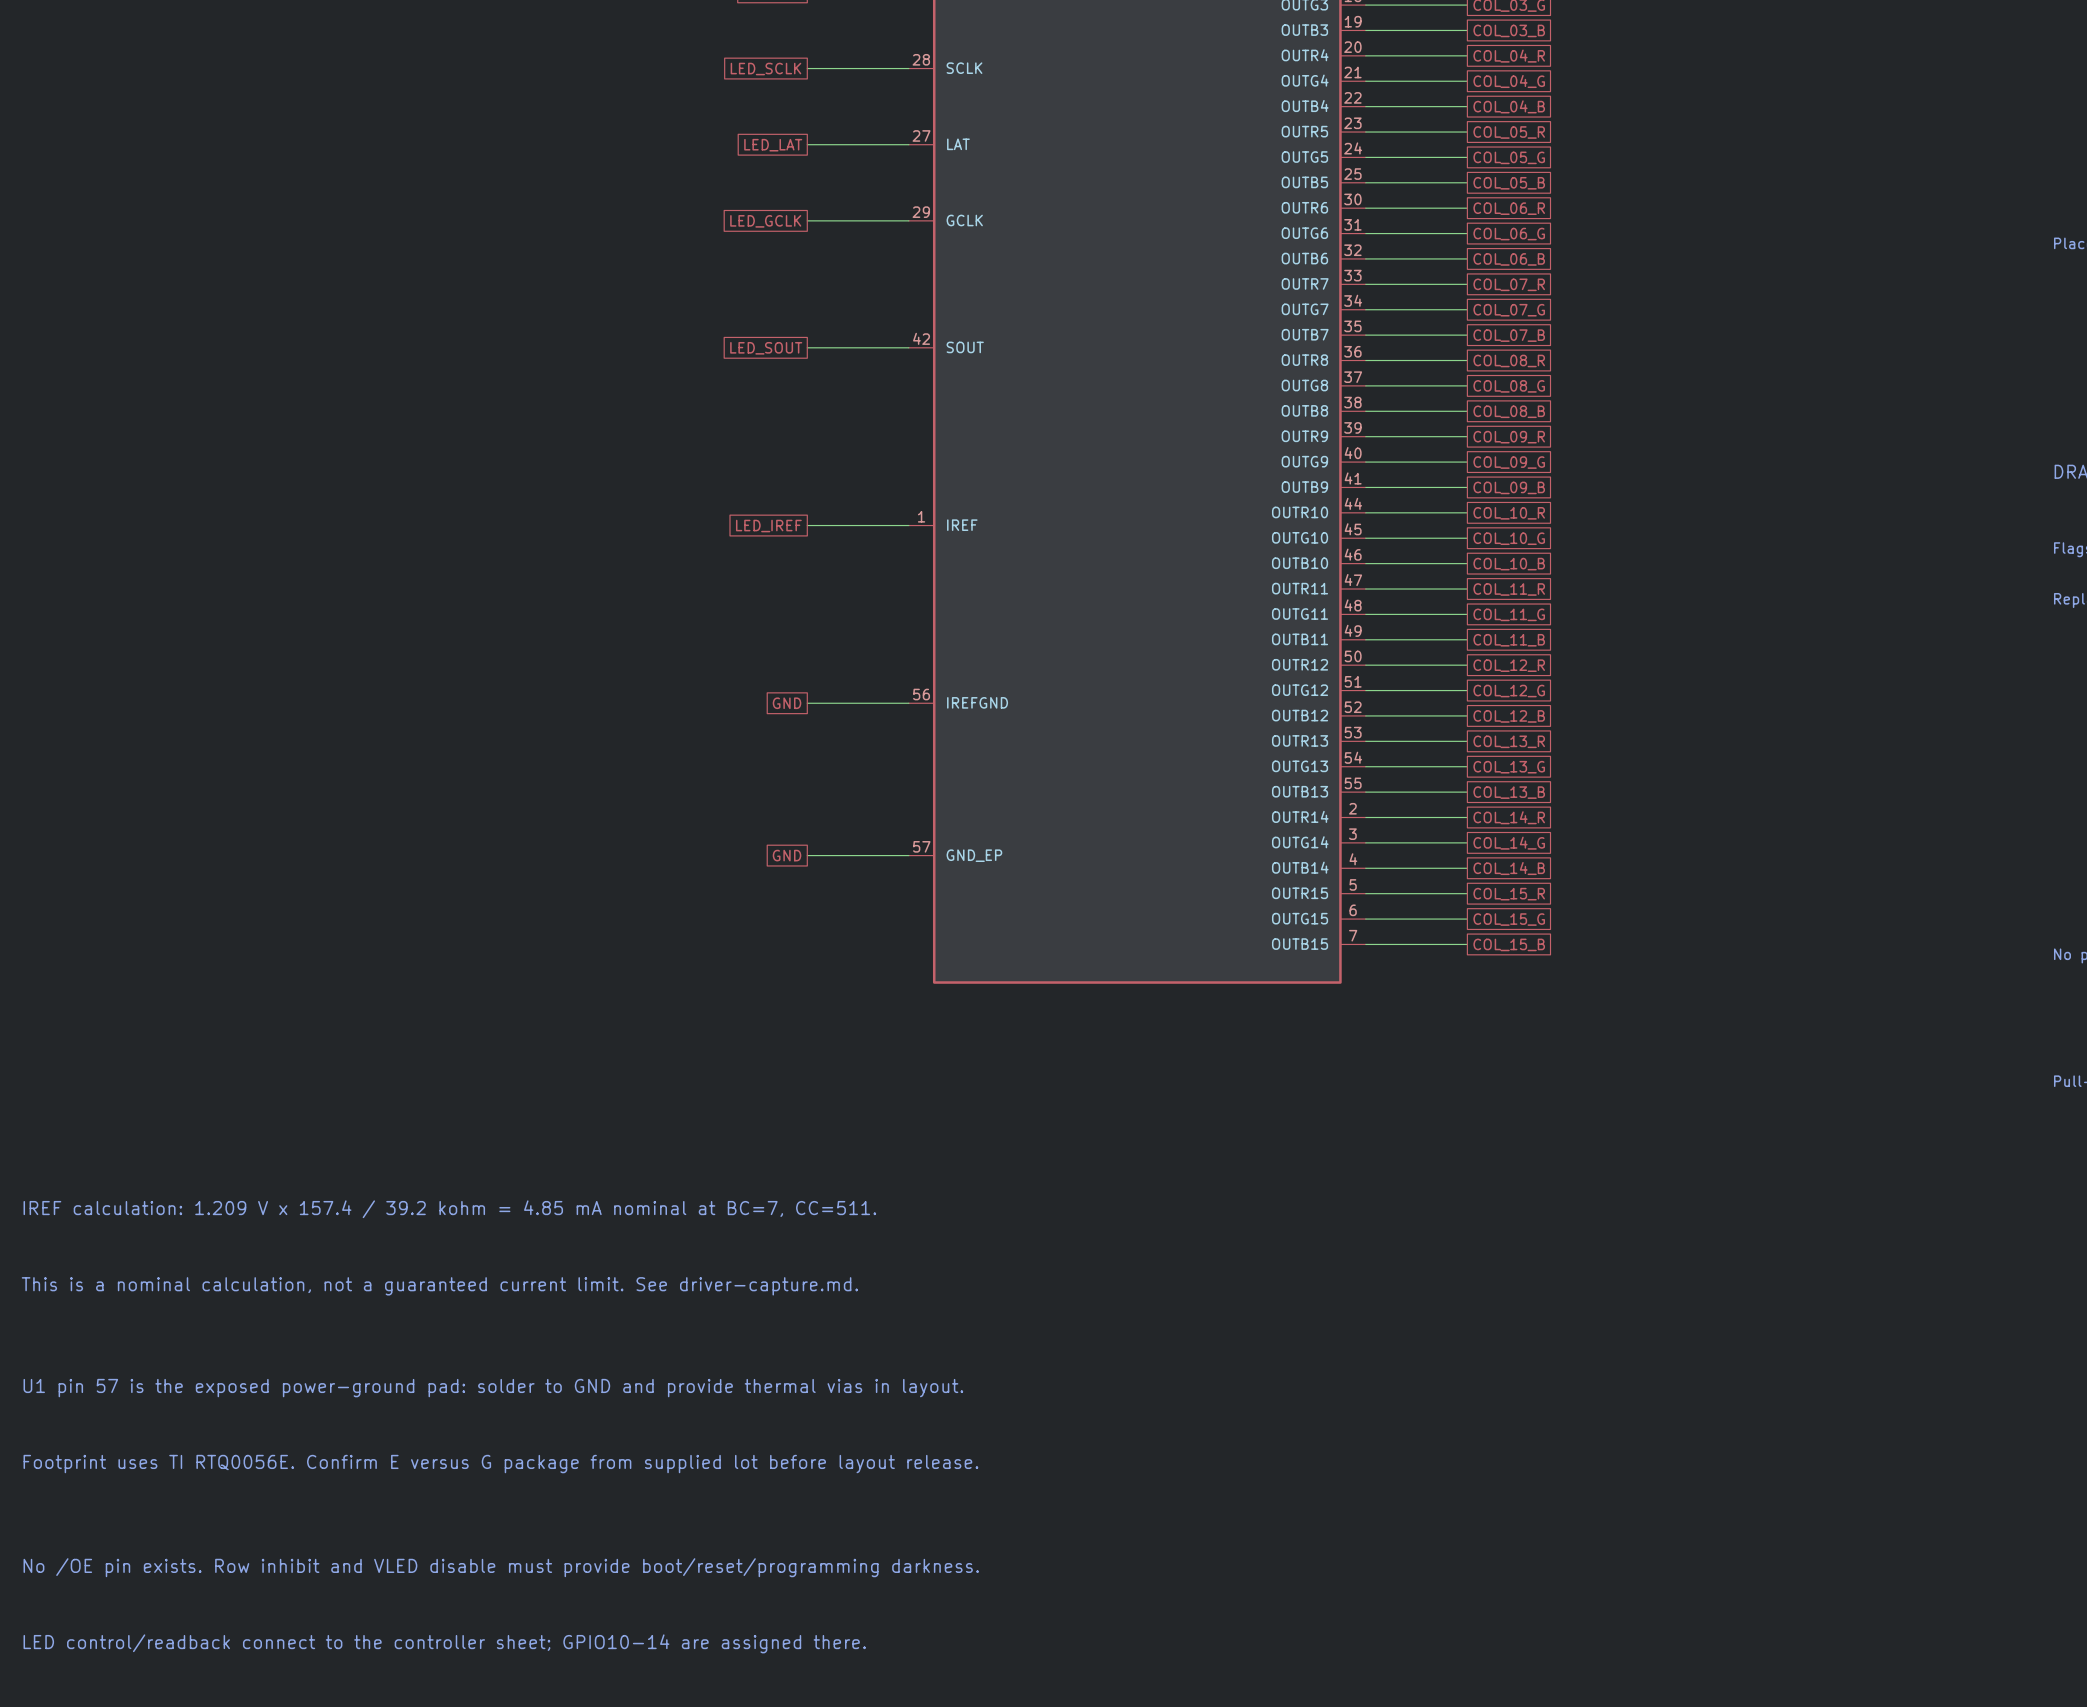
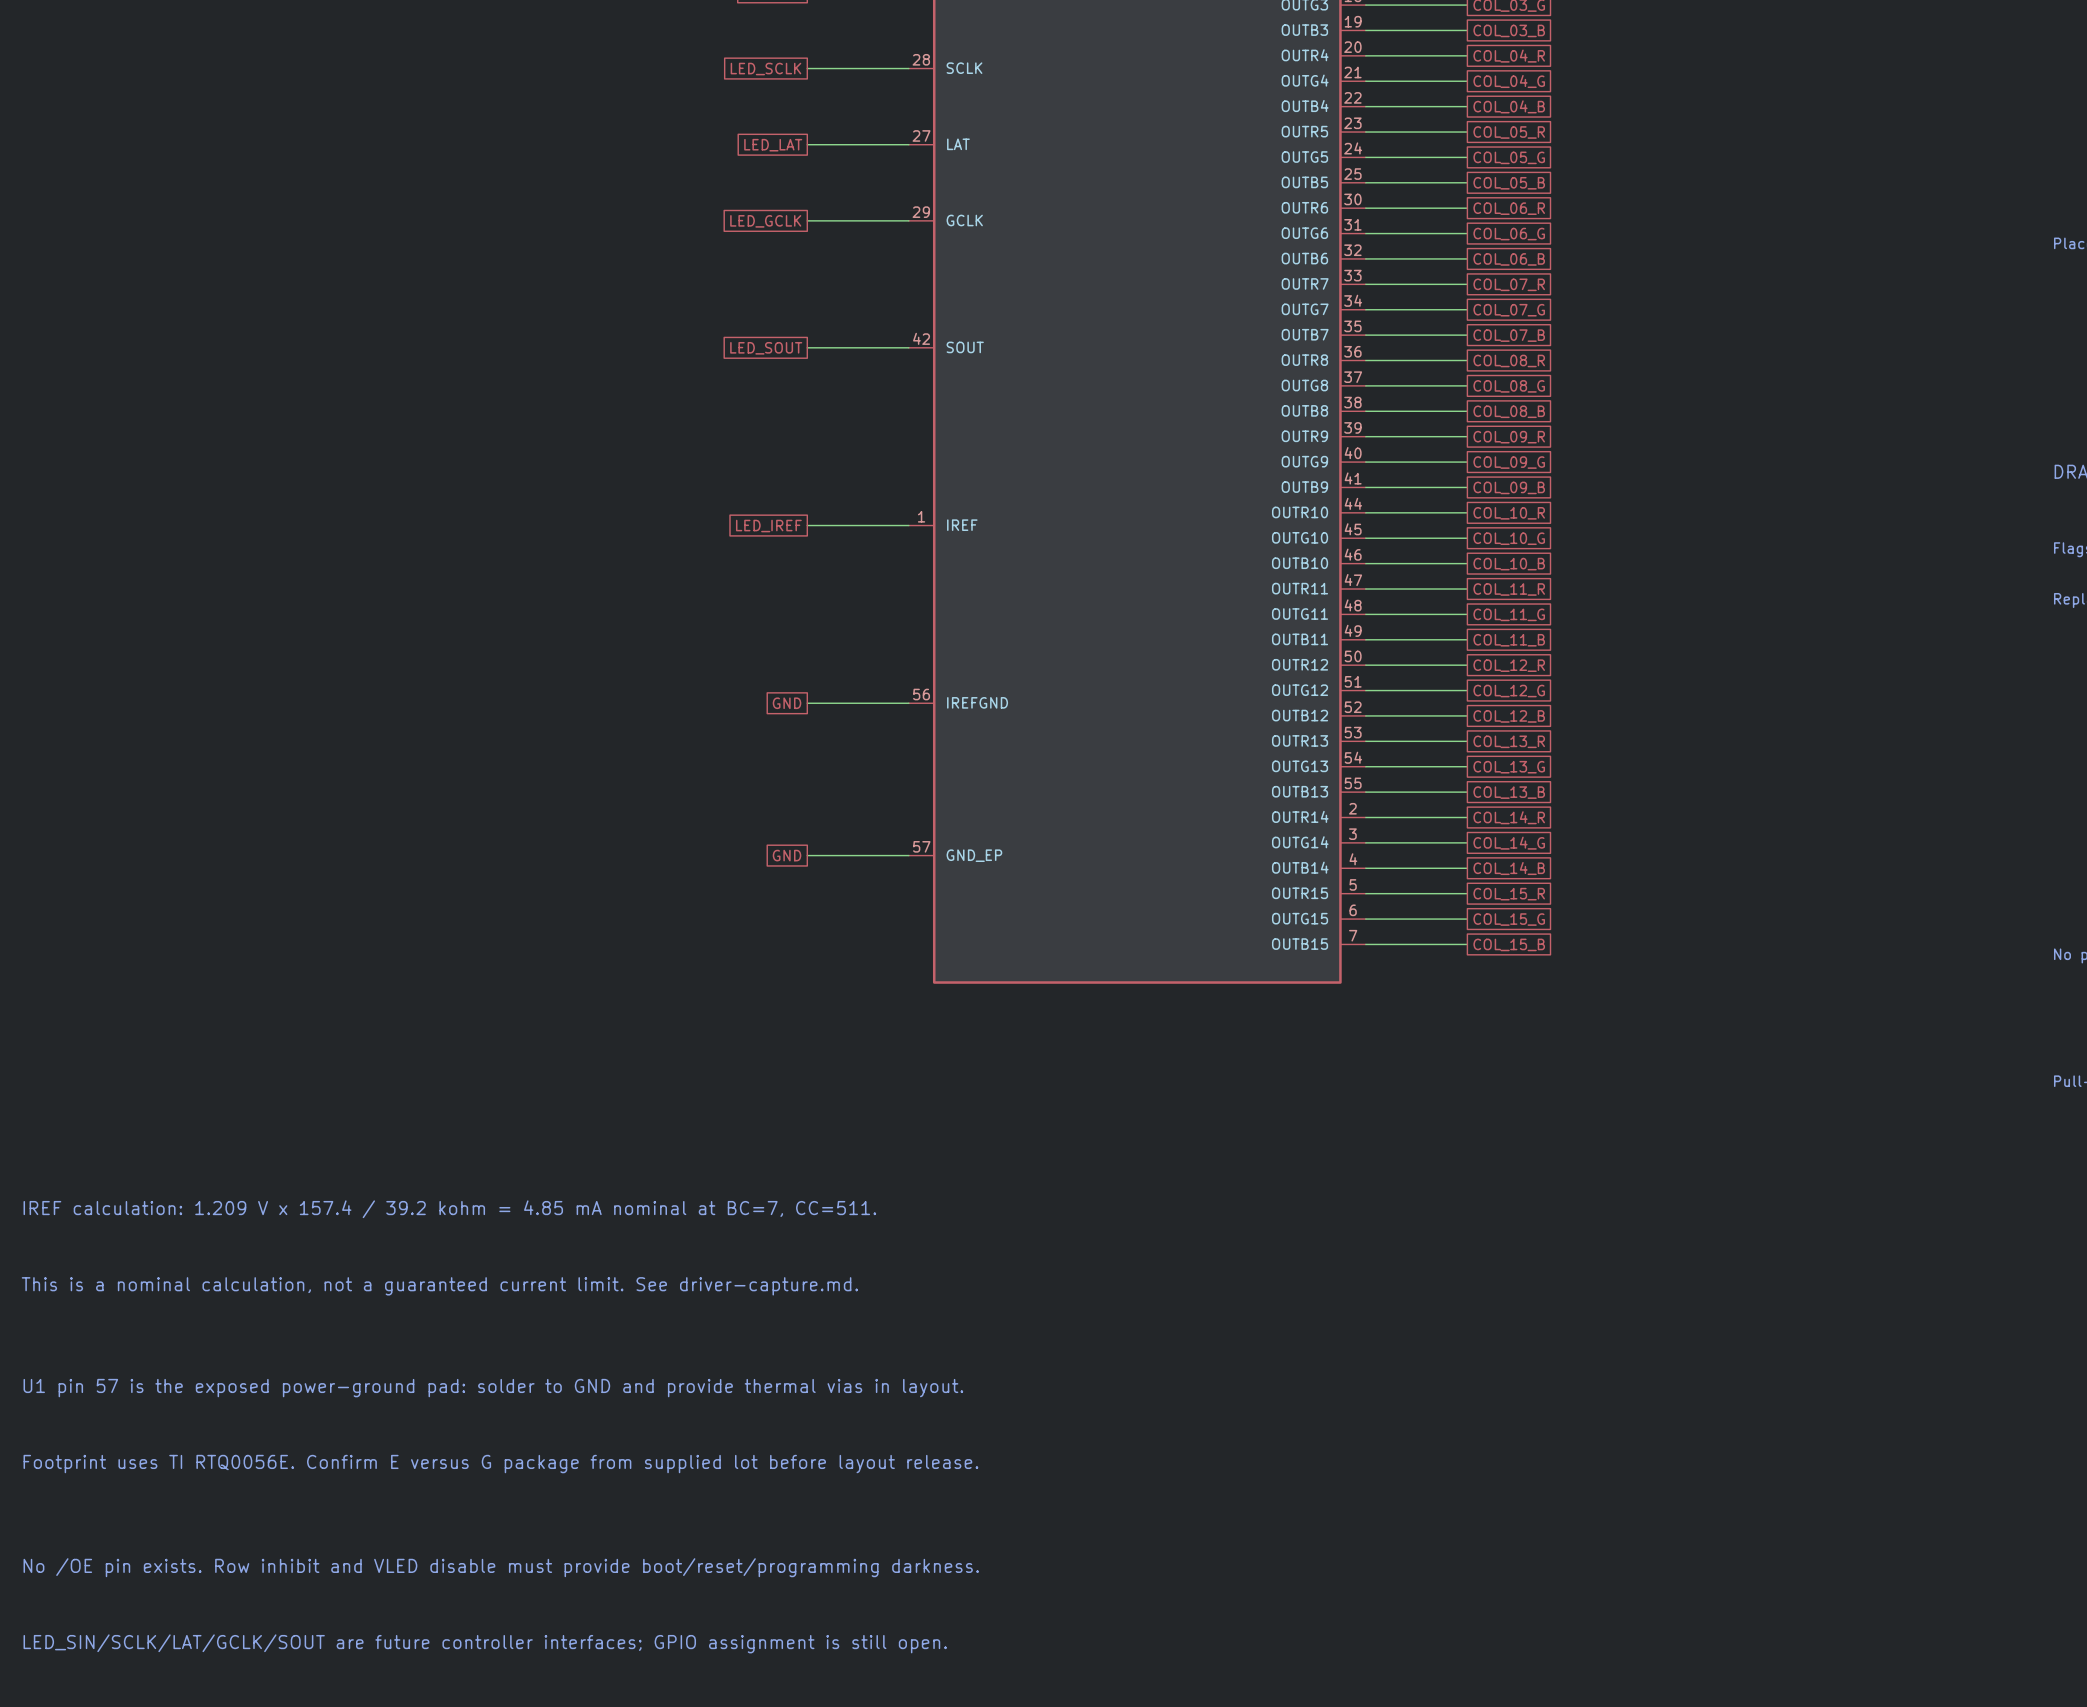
text: LED control/readback connect to the controller sheet; GPIO10-14 are assigned there. (444, 1643) -> LED_SIN/SCLK/LAT/GCLK/SOUT are future controller interfaces; GPIO assignment is still open. (485, 1643)

